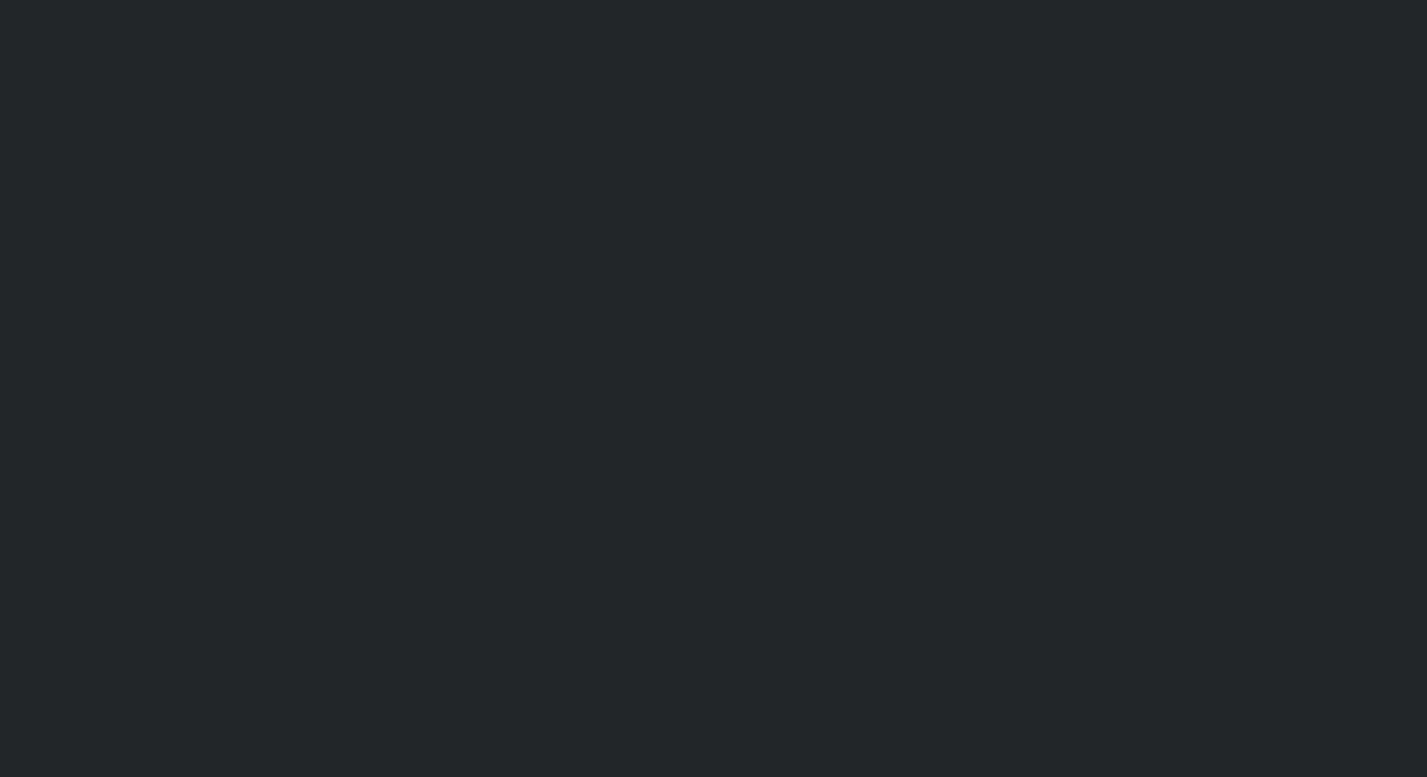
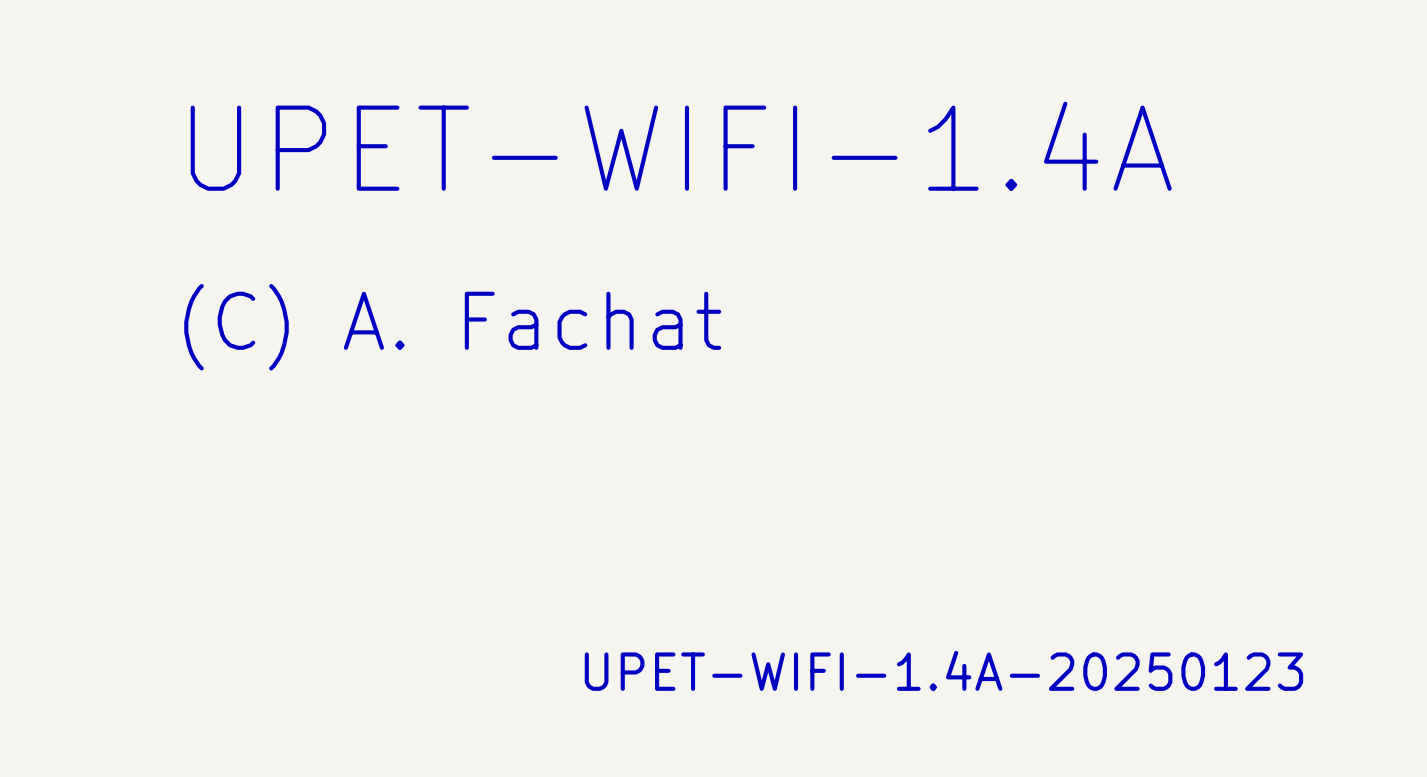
text: none -> UPET-WIFI-1.4A (681, 146)
text: none -> (C) A. Fachat (452, 327)
text: none -> UPET-WIFI-1.4A-20250123 (943, 670)

